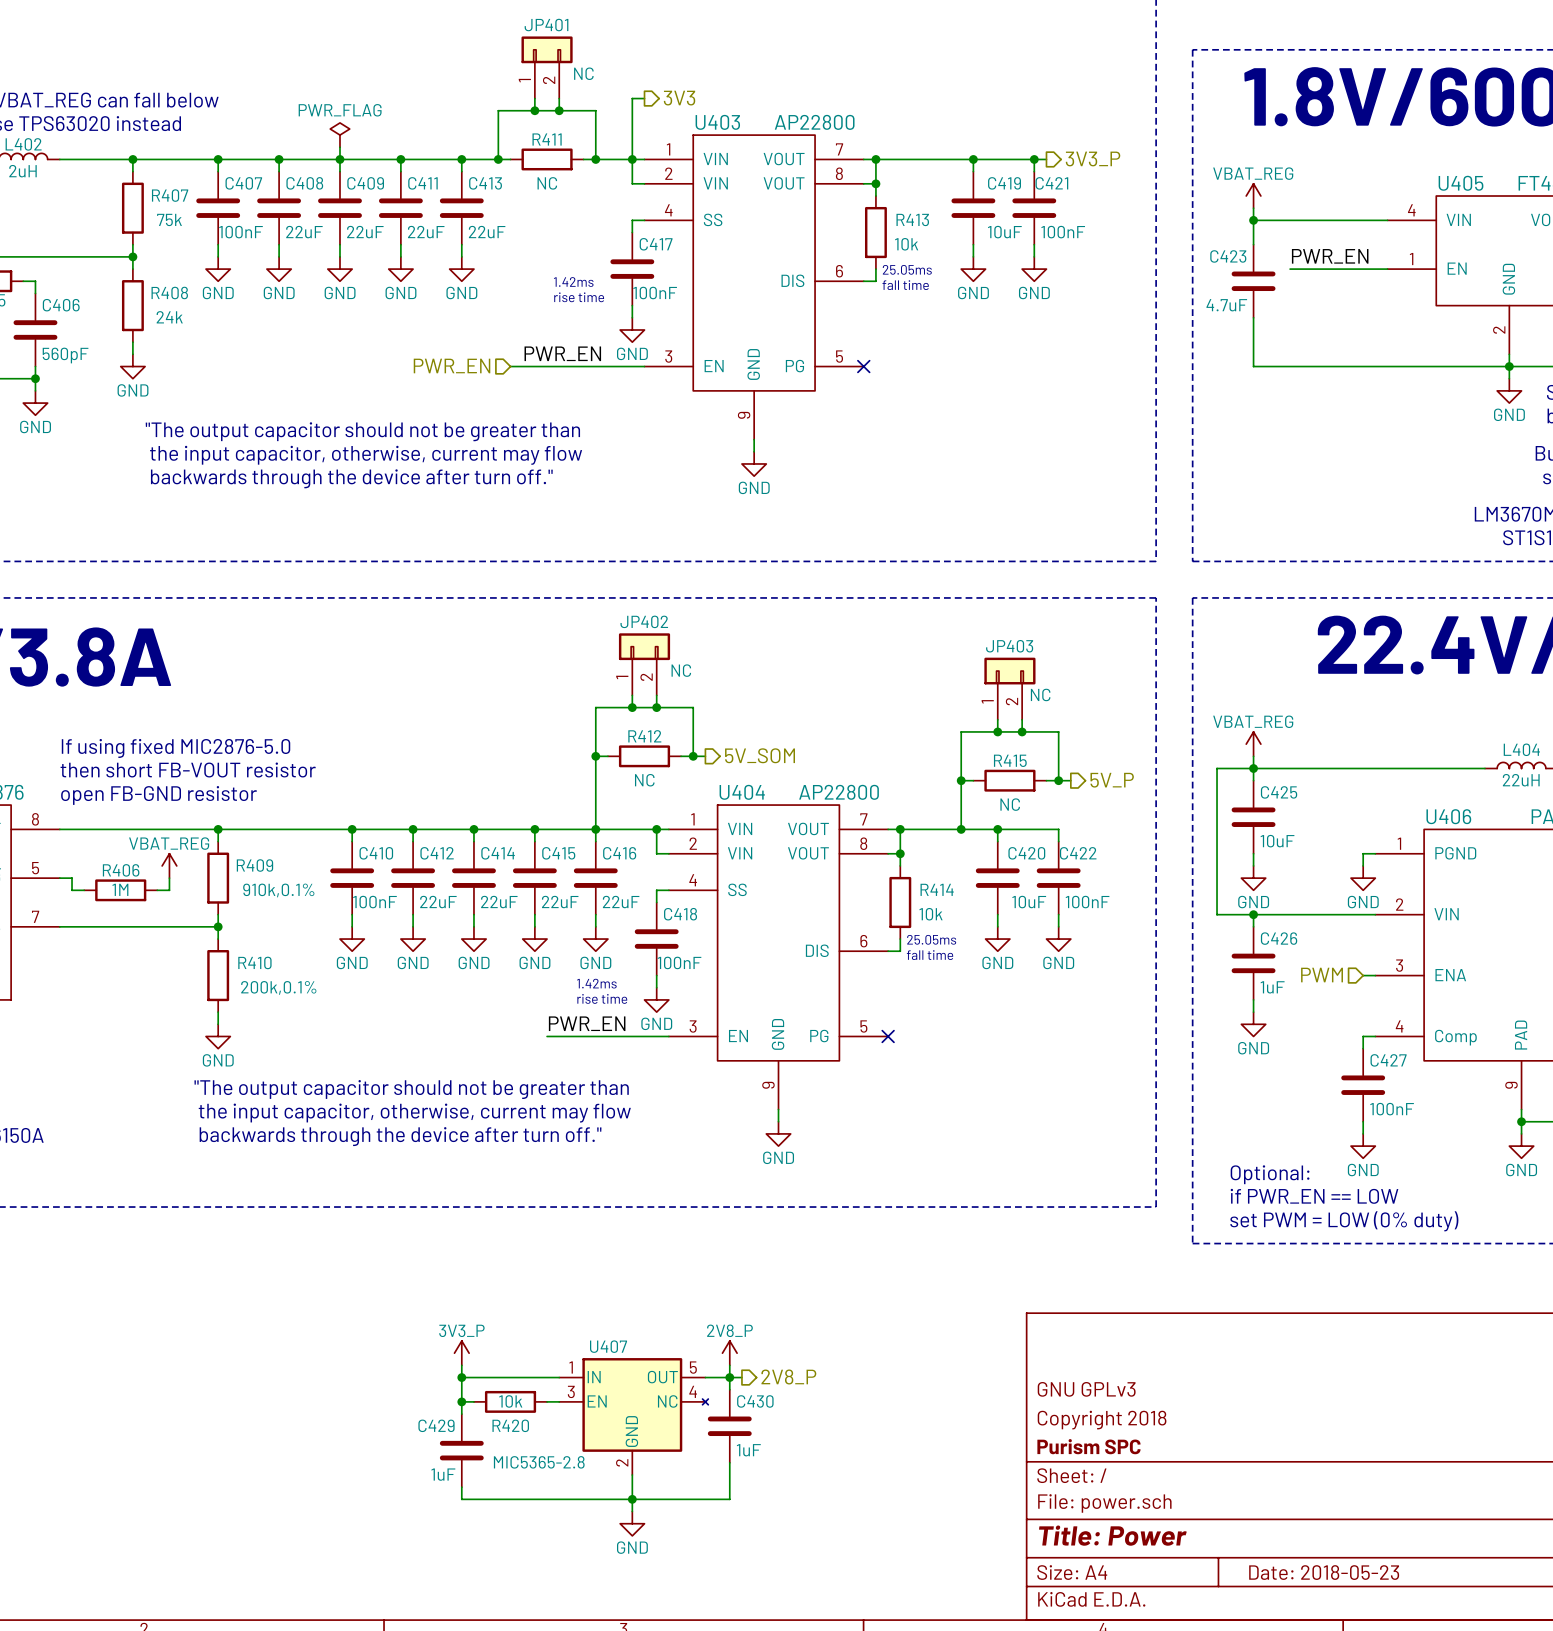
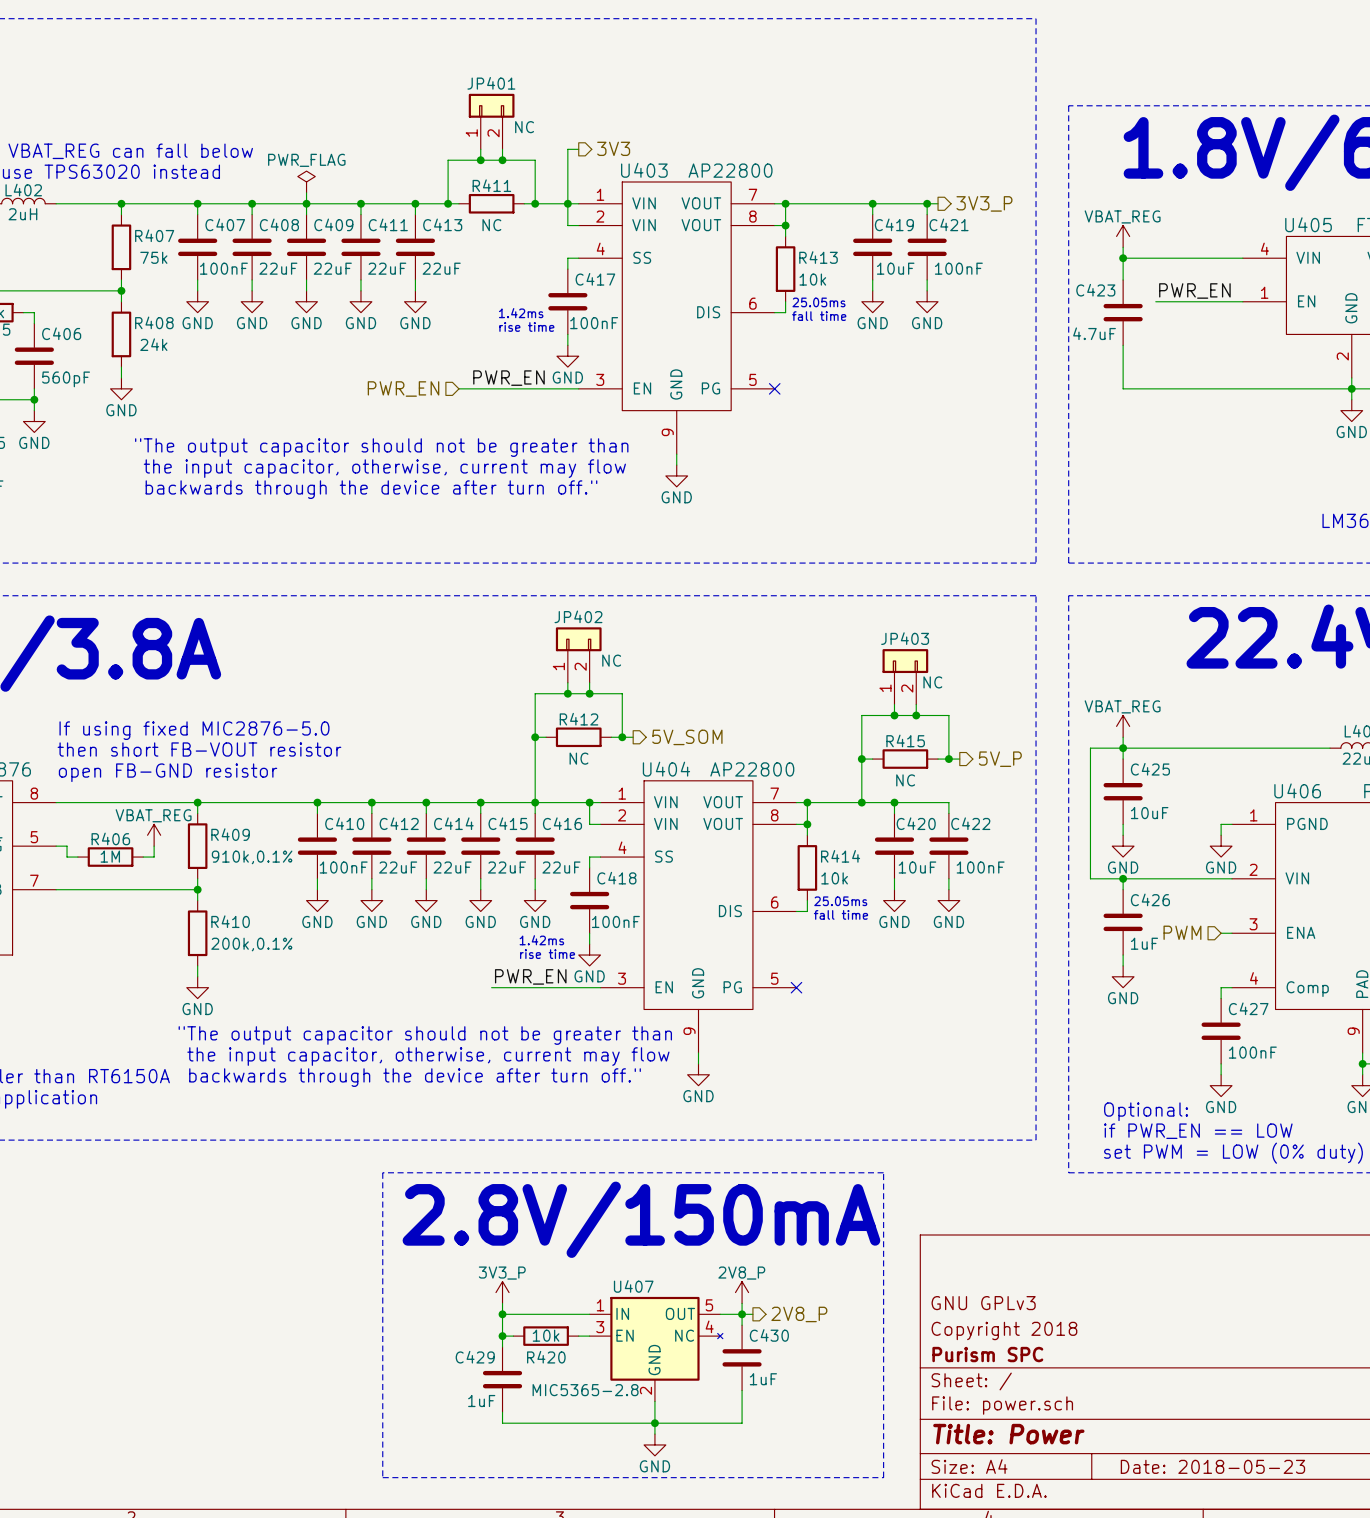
line: none -> (382, 1172) (382, 1477) (883, 1477) (883, 1172) (382, 1172)
text: none -> 2.8V/150mA (641, 1219)
power symbol position: 3V3_P (461, 1353) -> 3V3_P (502, 1292)
power symbol position: 2V8_P (729, 1353) -> 2V8_P (742, 1292)
wire: (461, 1365) (461, 1414) -> (502, 1303) (502, 1346)
wire: (729, 1365) (729, 1389) -> (742, 1303) (742, 1325)
hierarchical label position: 2V8_P (788, 1376) -> 2V8_P (799, 1314)
wire: (461, 1377) (559, 1377) -> none
junction: (461, 1377) -> none
wire: (705, 1377) (741, 1377) -> (720, 1314) (752, 1314)
junction: (729, 1377) -> none
wire: (461, 1401) (473, 1401) -> (502, 1336) (513, 1336)
junction: (461, 1401) -> none
R420 position: (510, 1401) -> (546, 1336)
junction: none -> (502, 1314)
junction: none -> (742, 1314)
U407 position: (633, 1416) -> (656, 1349)
junction: none -> (502, 1336)
C430 position: (729, 1426) -> (742, 1357)
C429 position: (461, 1450) -> (502, 1379)
wire: (729, 1462) (729, 1499) (461, 1499) (461, 1487) -> (742, 1390) (742, 1423) (502, 1423) (502, 1412)
wire: (632, 1474) (632, 1511) -> (654, 1401) (654, 1434)
junction: (632, 1499) -> none
power symbol position: GND (632, 1523) -> GND (654, 1444)
junction: none -> (654, 1423)

